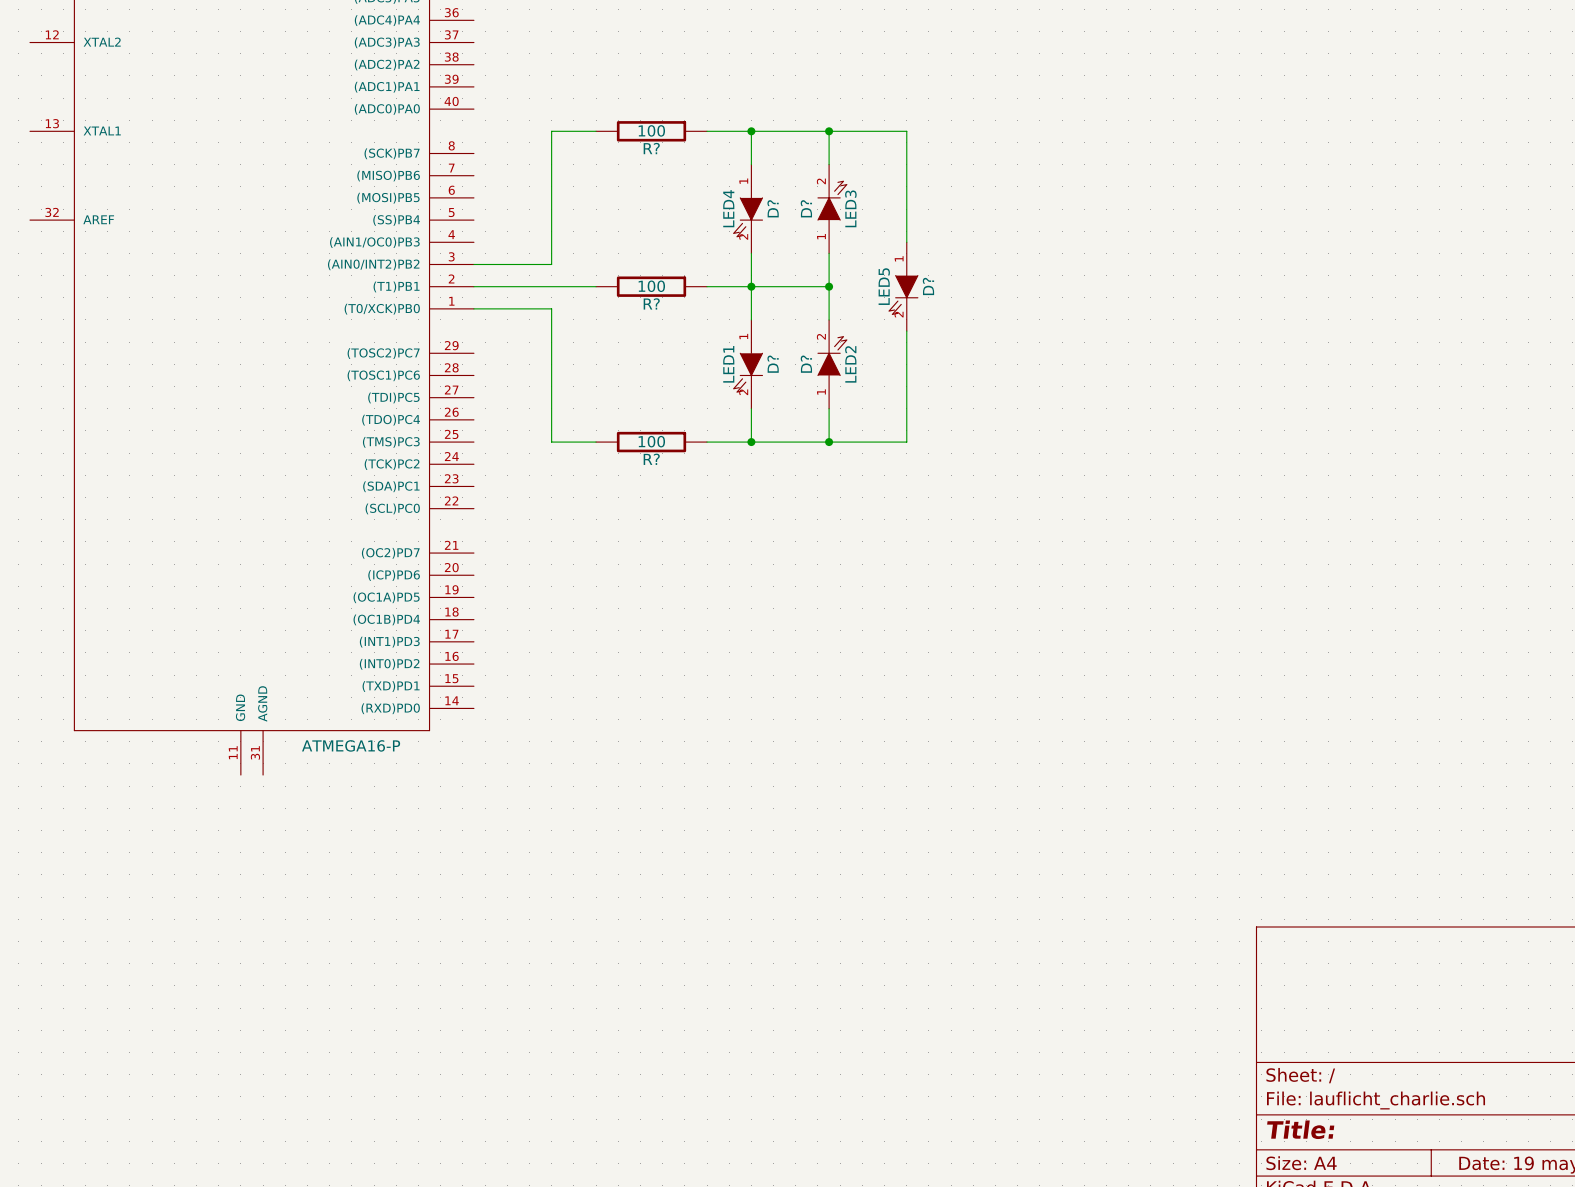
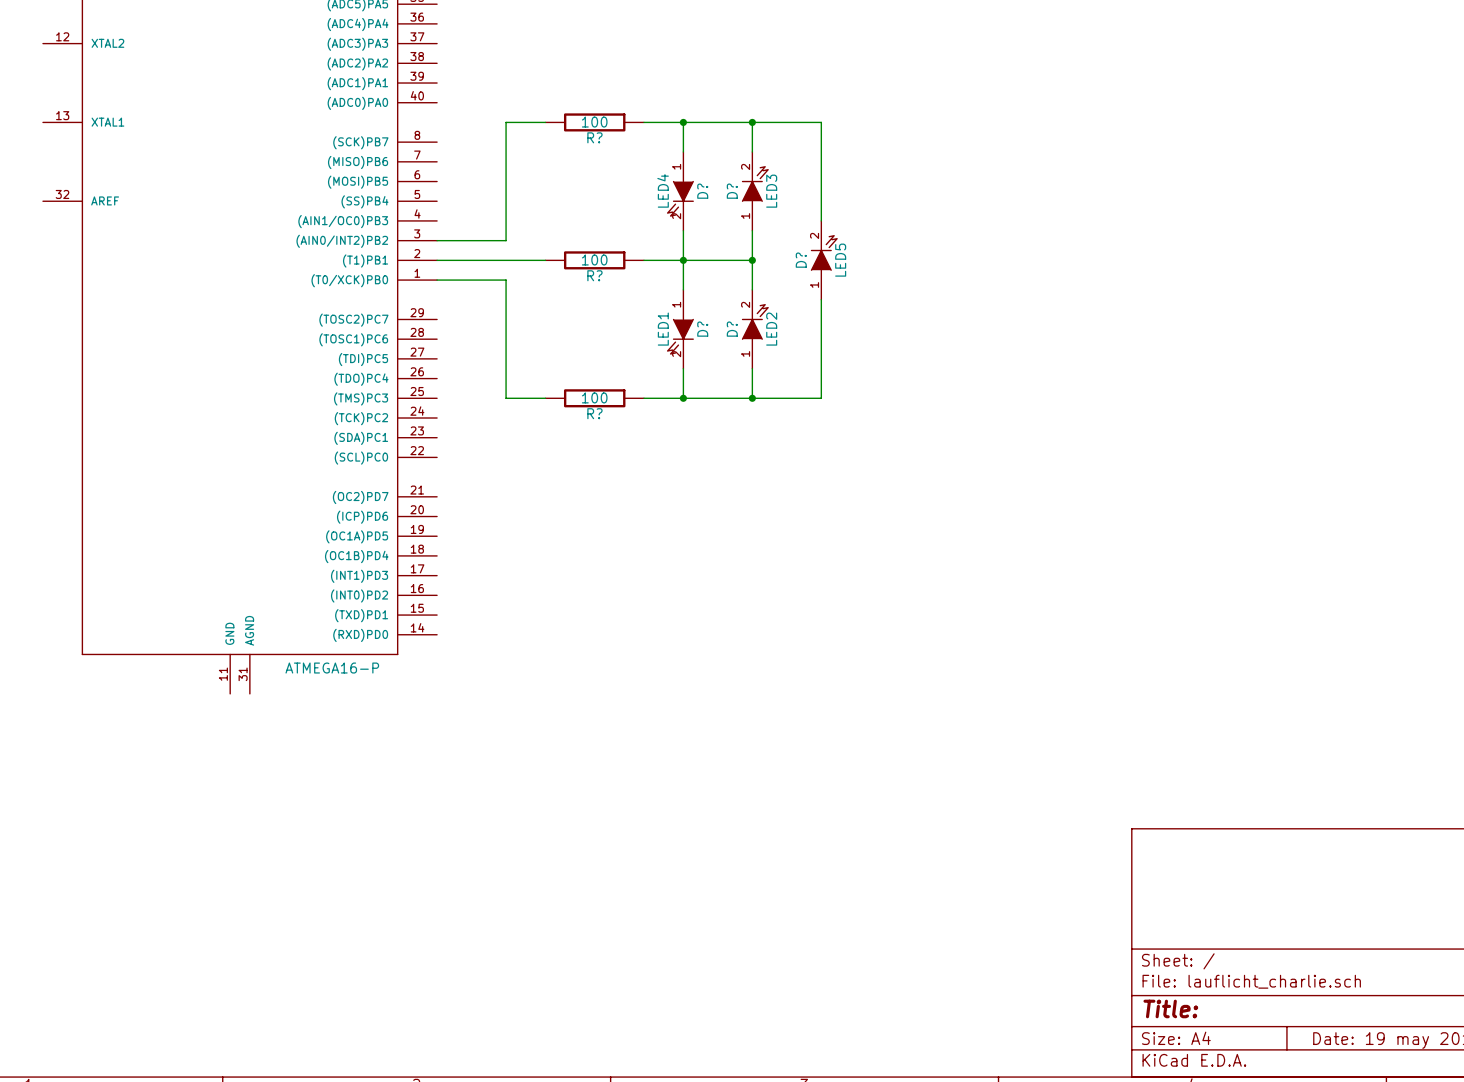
D? rotation: 0° (903, 295) -> 180° (824, 252)

